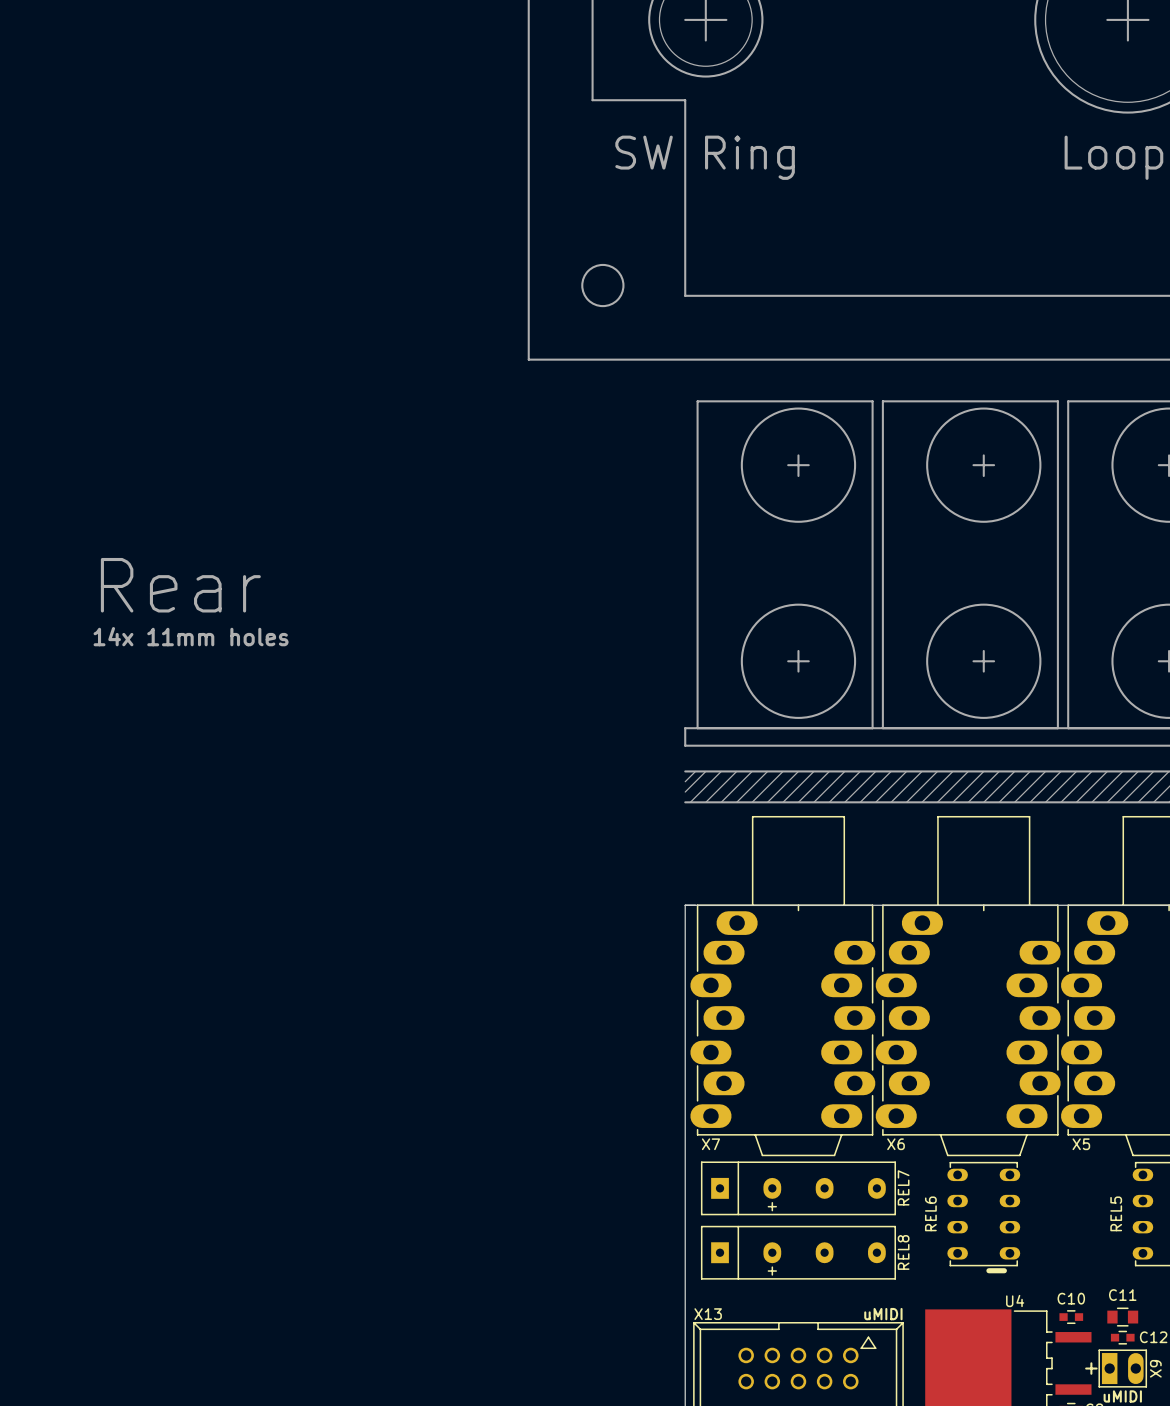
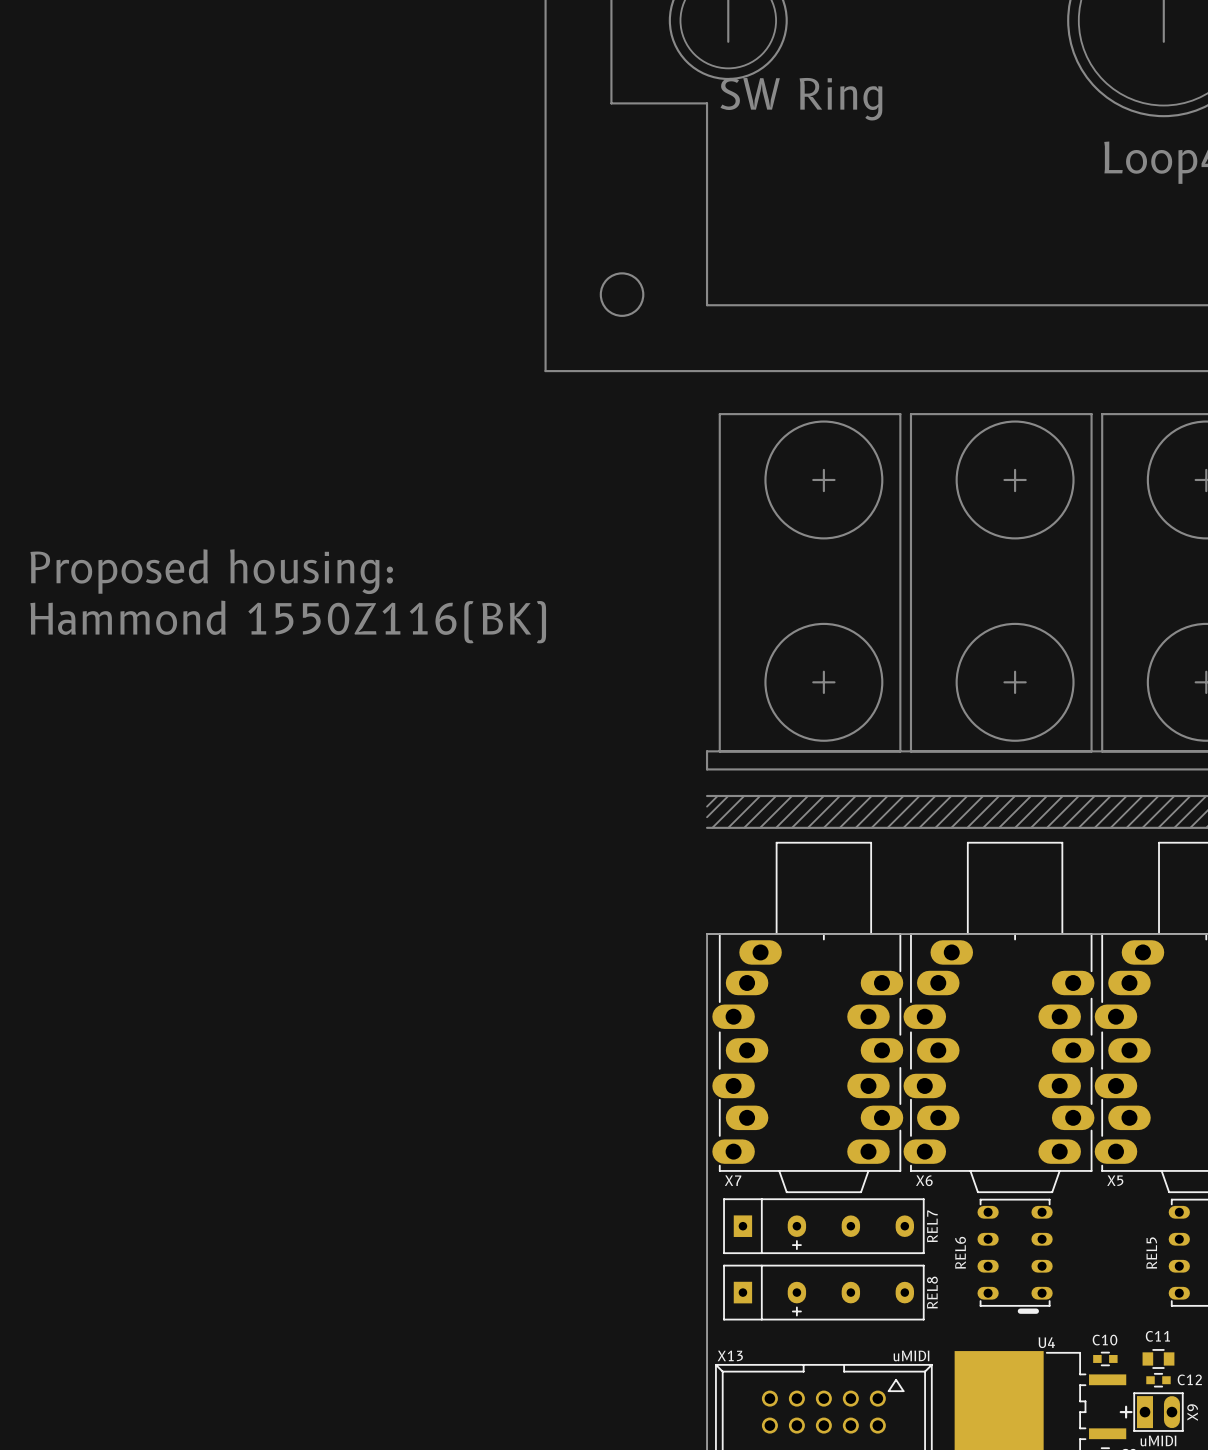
line: (685, 19) (726, 19) -> none
line: (1107, 19) (1148, 19) -> none
text position: SW Ring (705, 157) -> SW Ring (801, 99)
text: none -> Proposed housing: (211, 571)
text: Rear (180, 585) -> none
text: none -> Hammond 1550Z116(BK) (288, 621)
text: 14x 11mm holes (191, 636) -> none

